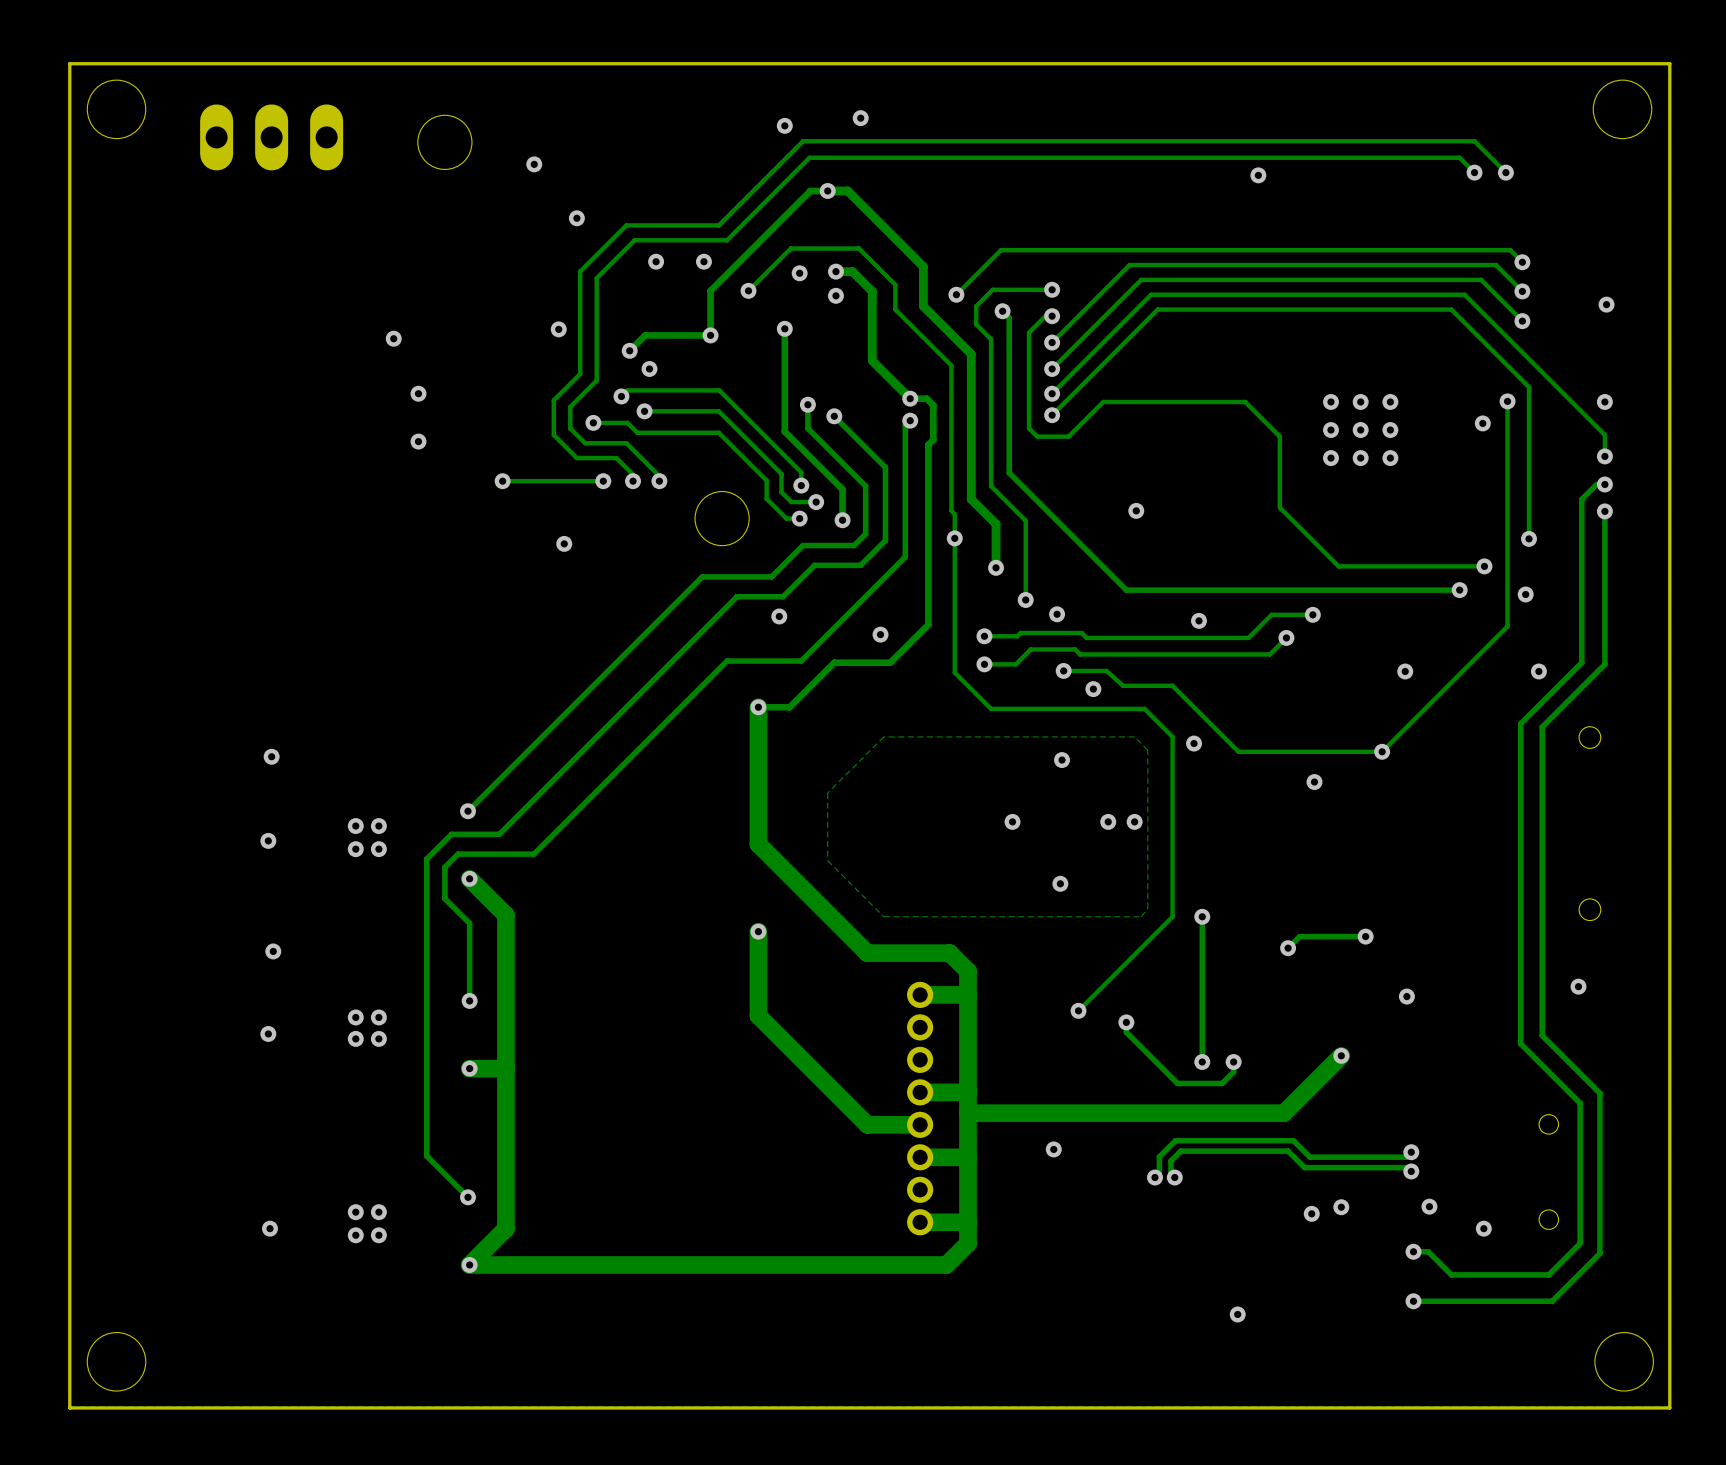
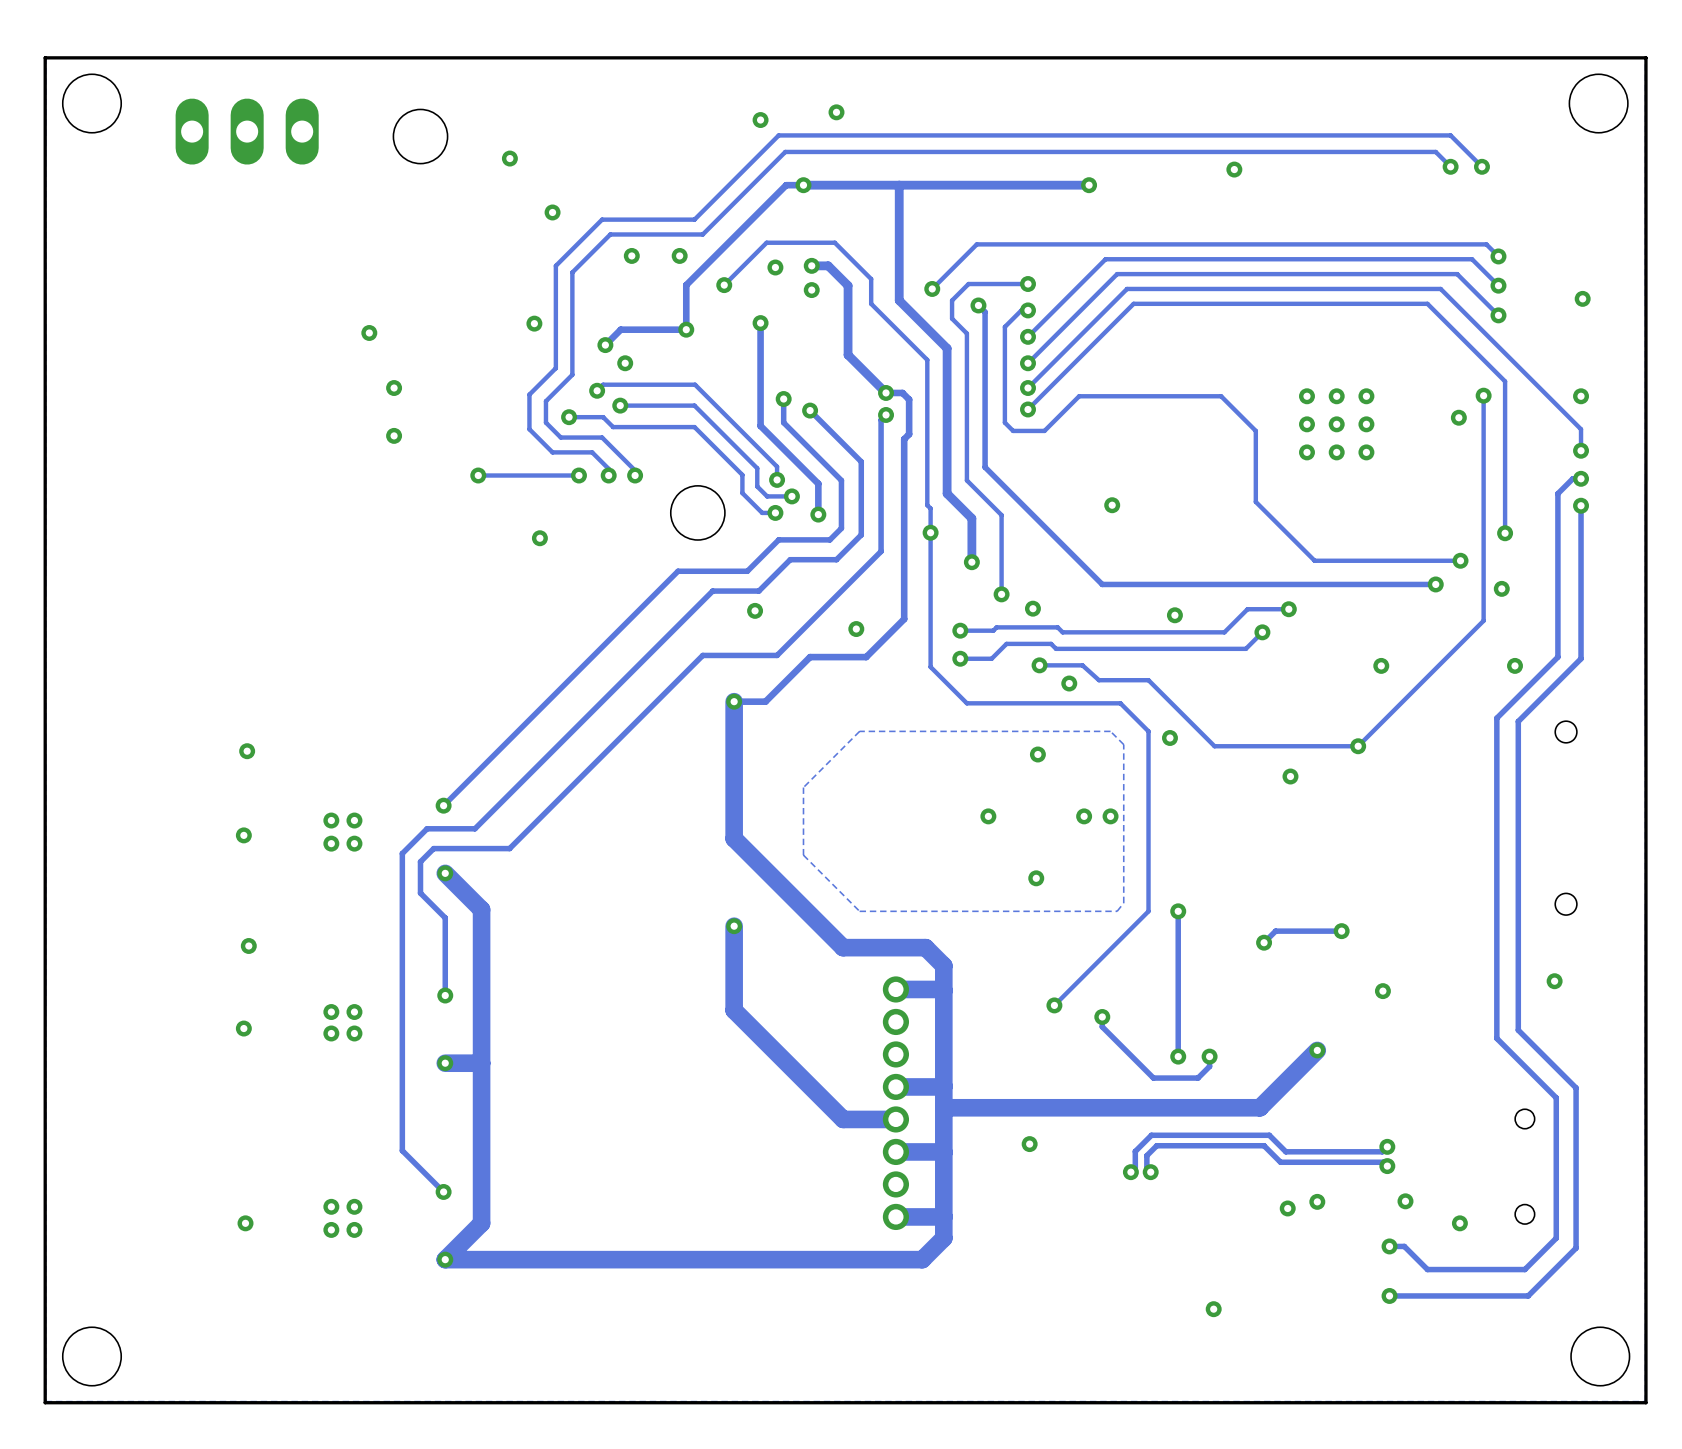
track: (847, 190) (923, 266) -> (899, 185) (899, 260)
track: none -> (1089, 185) (823, 185)
via: none -> (1089, 185)

